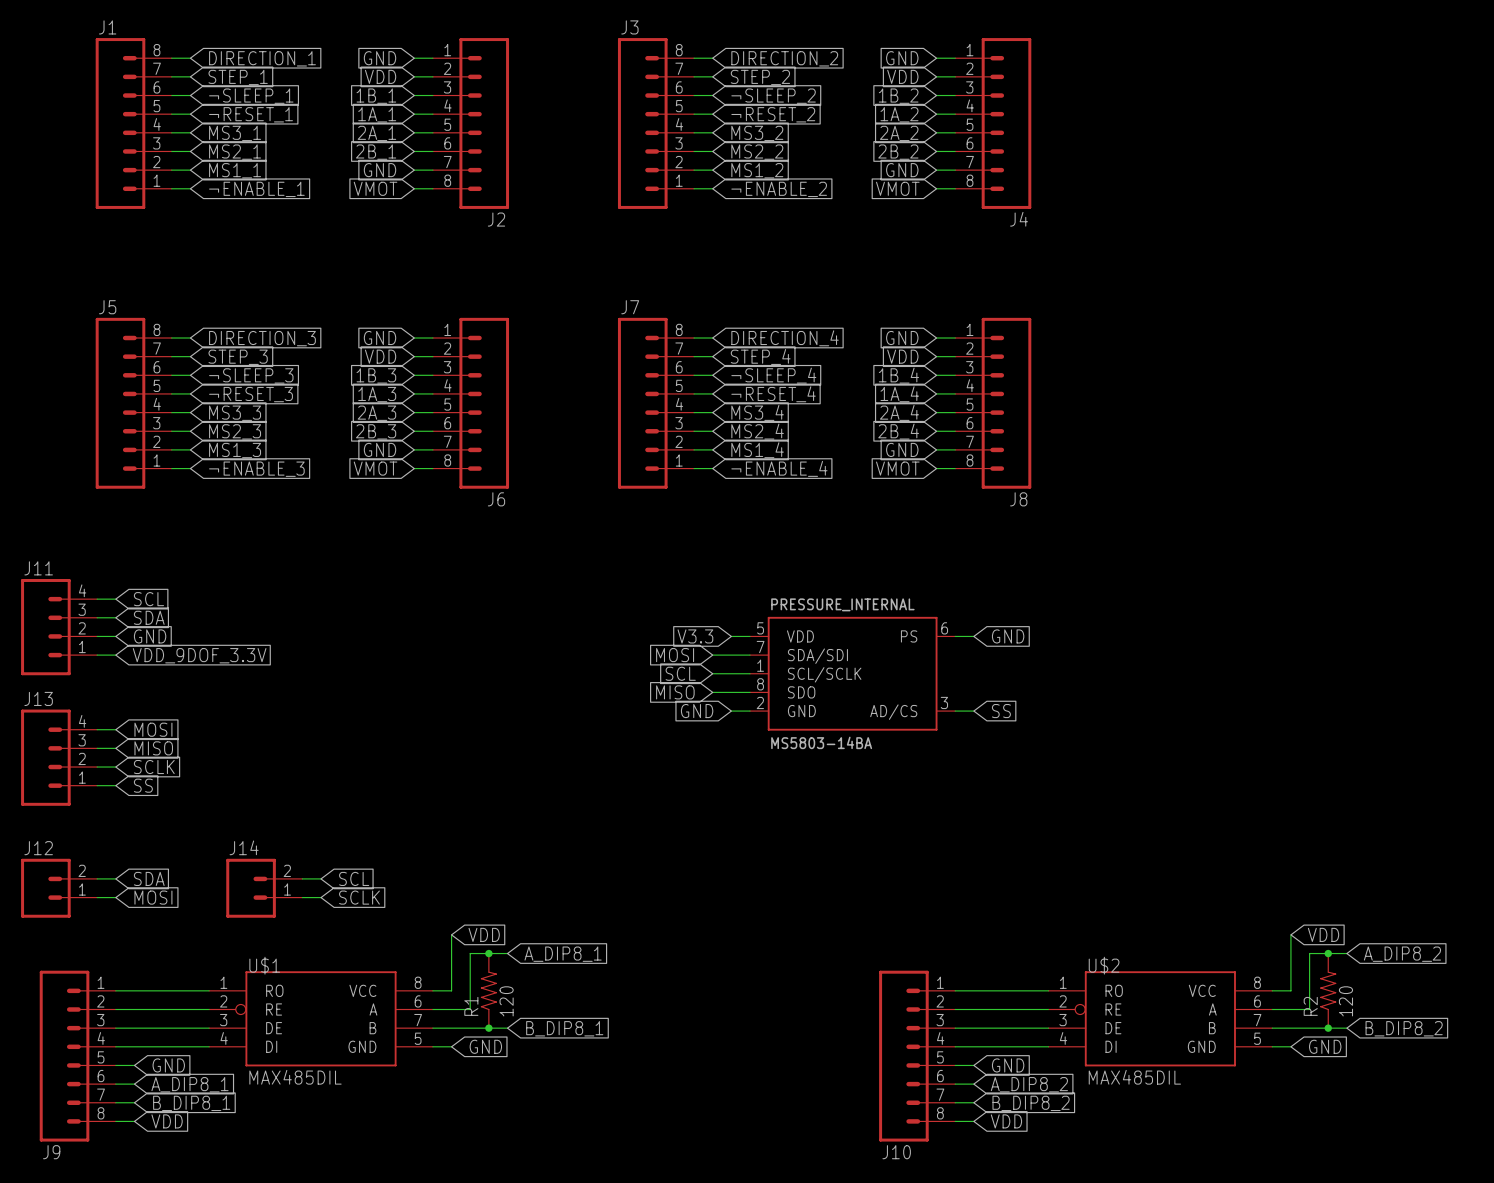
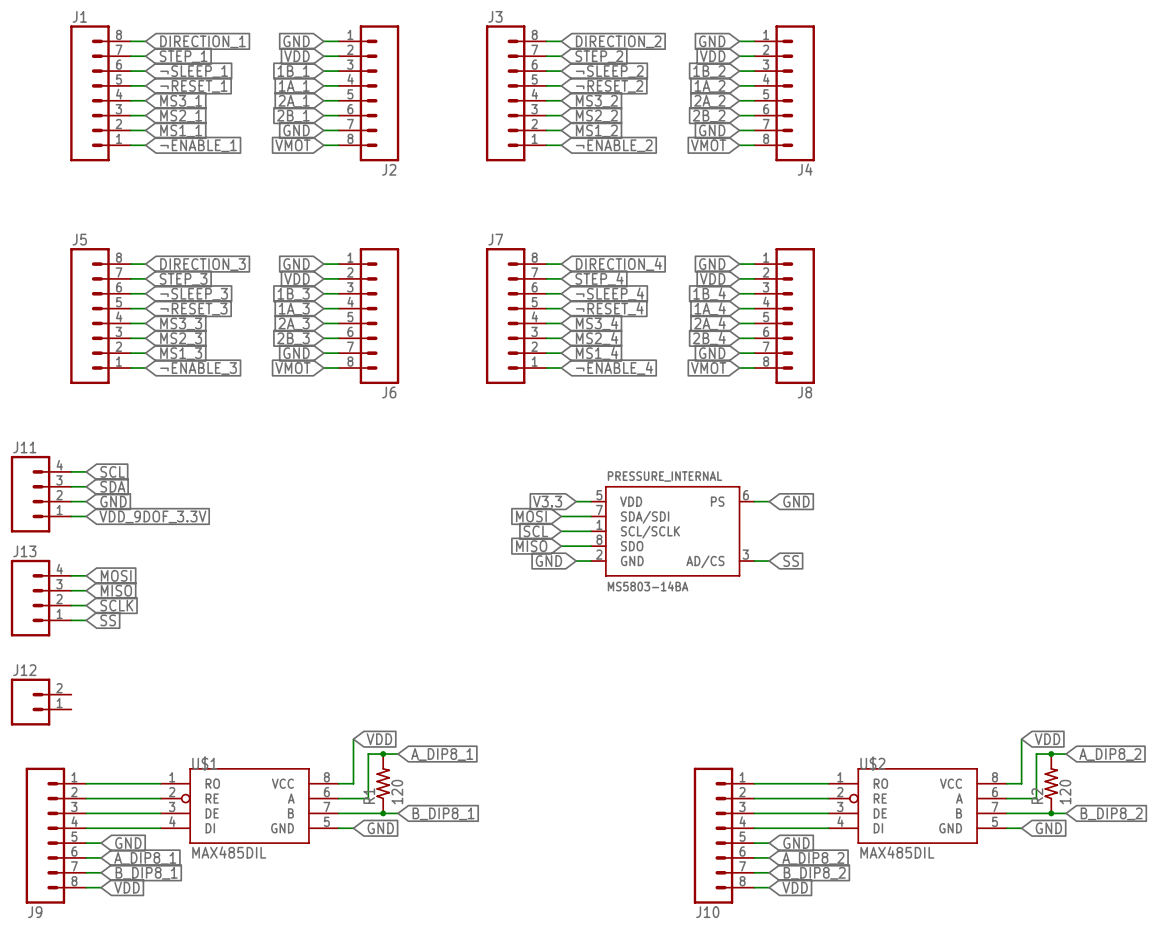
wire: (97, 878) (115, 878) -> none
global label: SDA (149, 878) -> none
wire: (302, 878) (321, 878) -> none
global label: SCL (354, 878) -> none
J14: (264, 888) -> none
wire: (97, 897) (115, 897) -> none
global label: MOSI (153, 897) -> none
wire: (302, 897) (321, 897) -> none
global label: SCLK (359, 897) -> none

